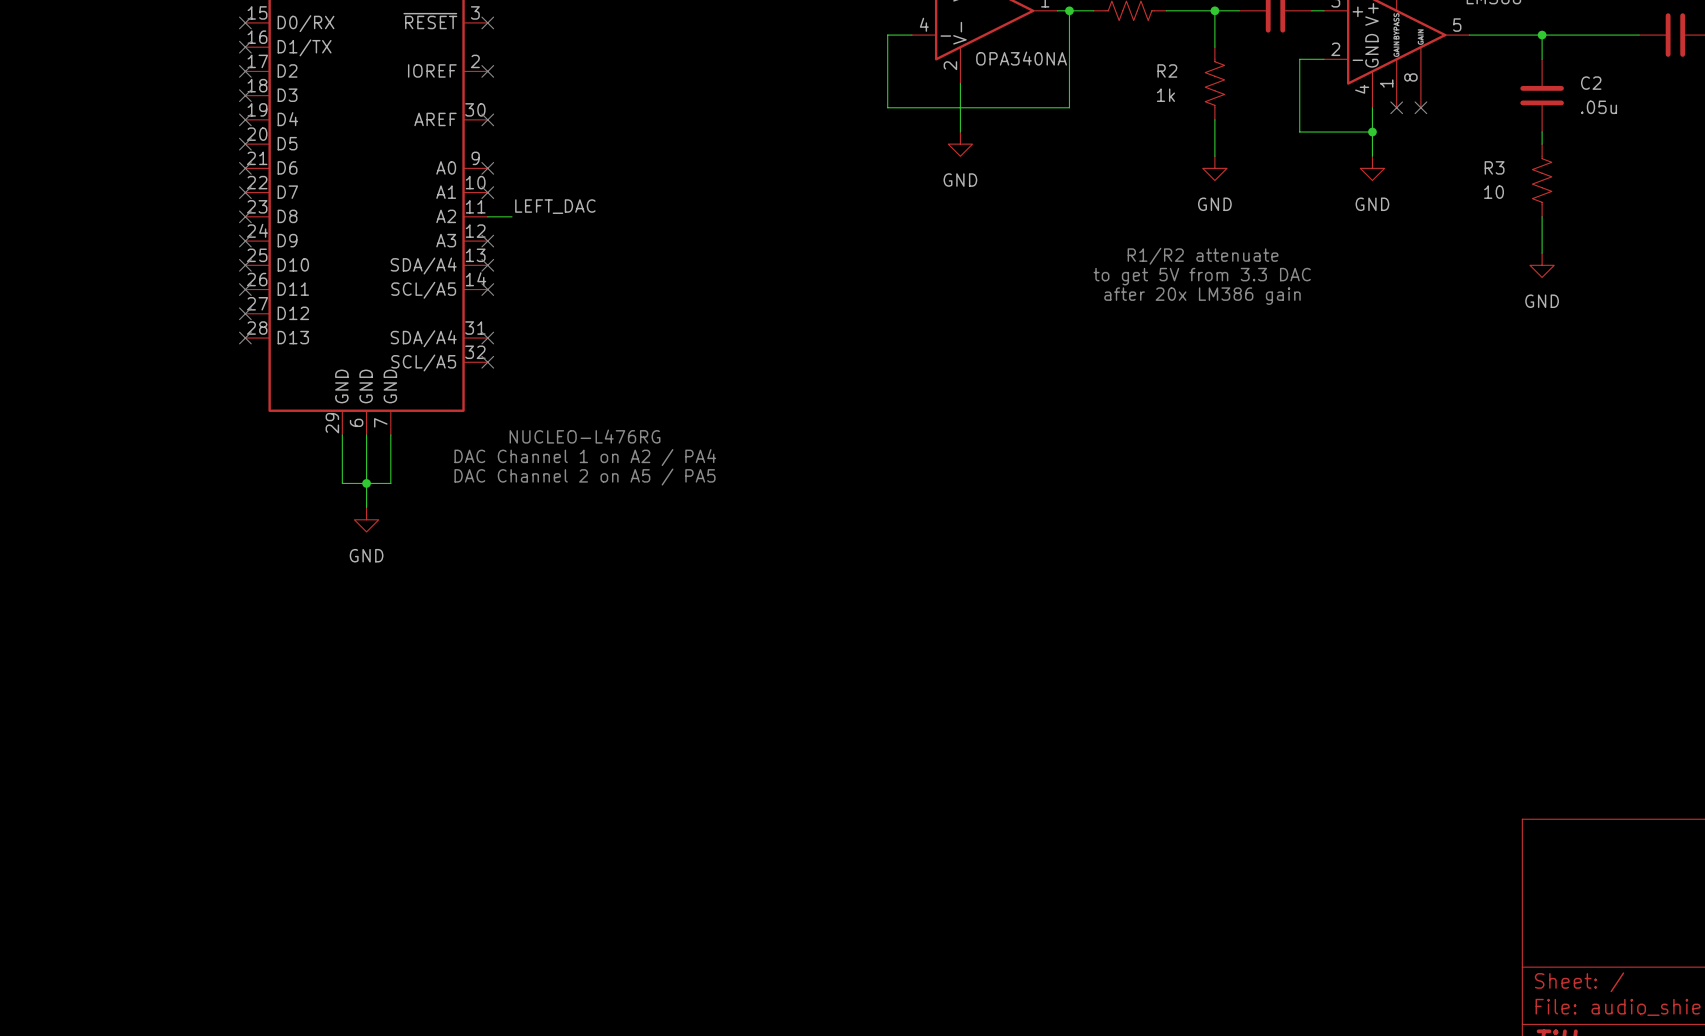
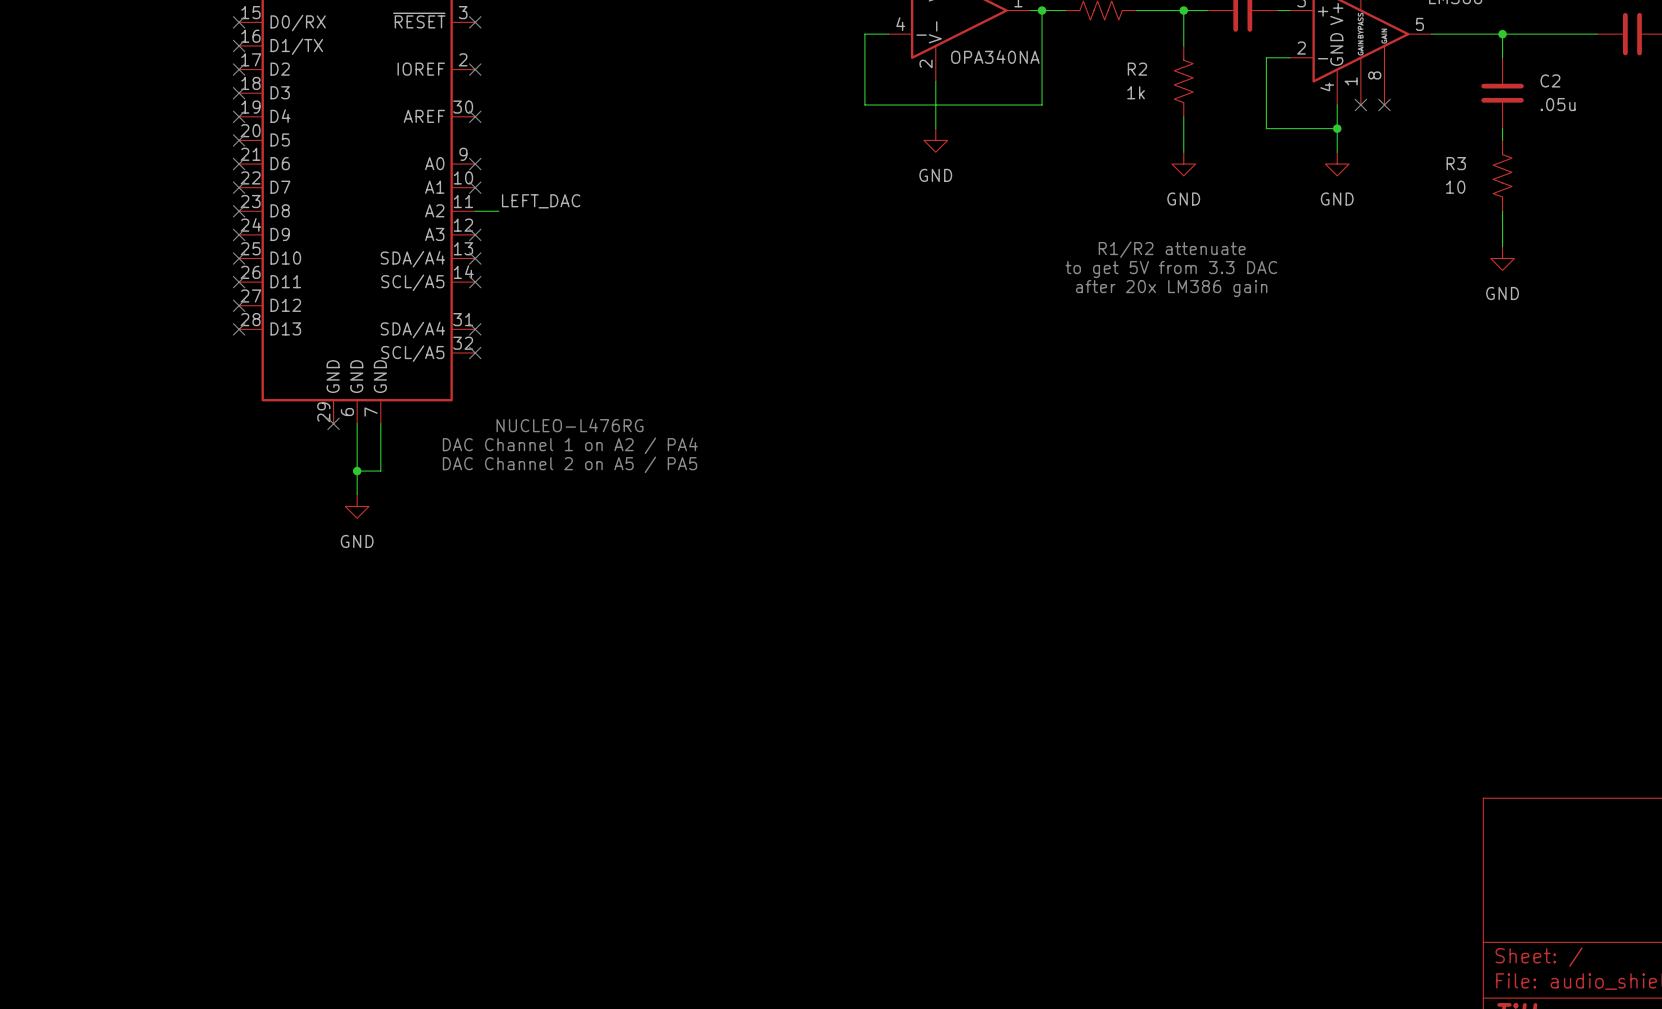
wire: (342, 434) (342, 483) (366, 483) -> none
no-connect mark: none -> (333, 423)

